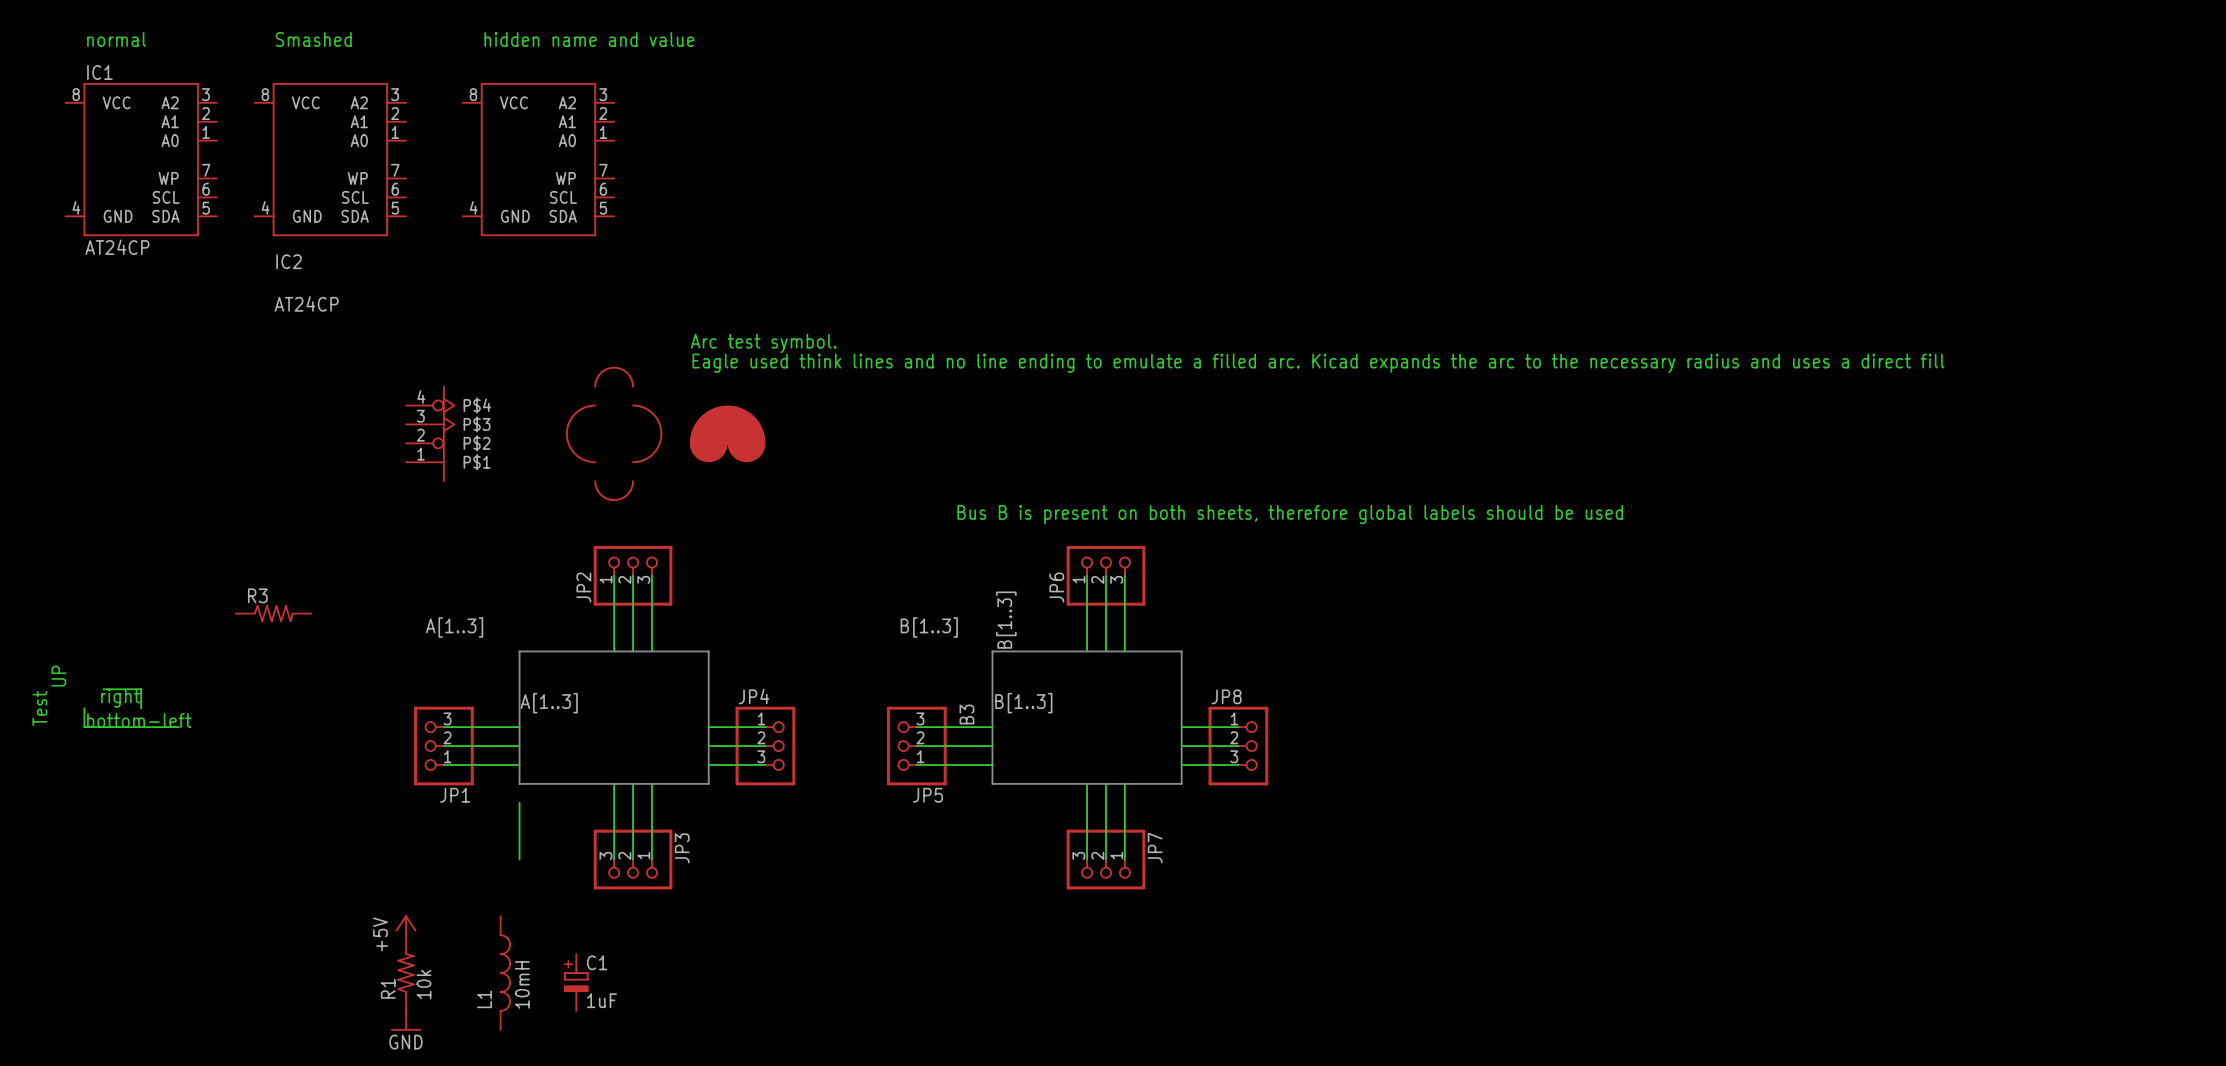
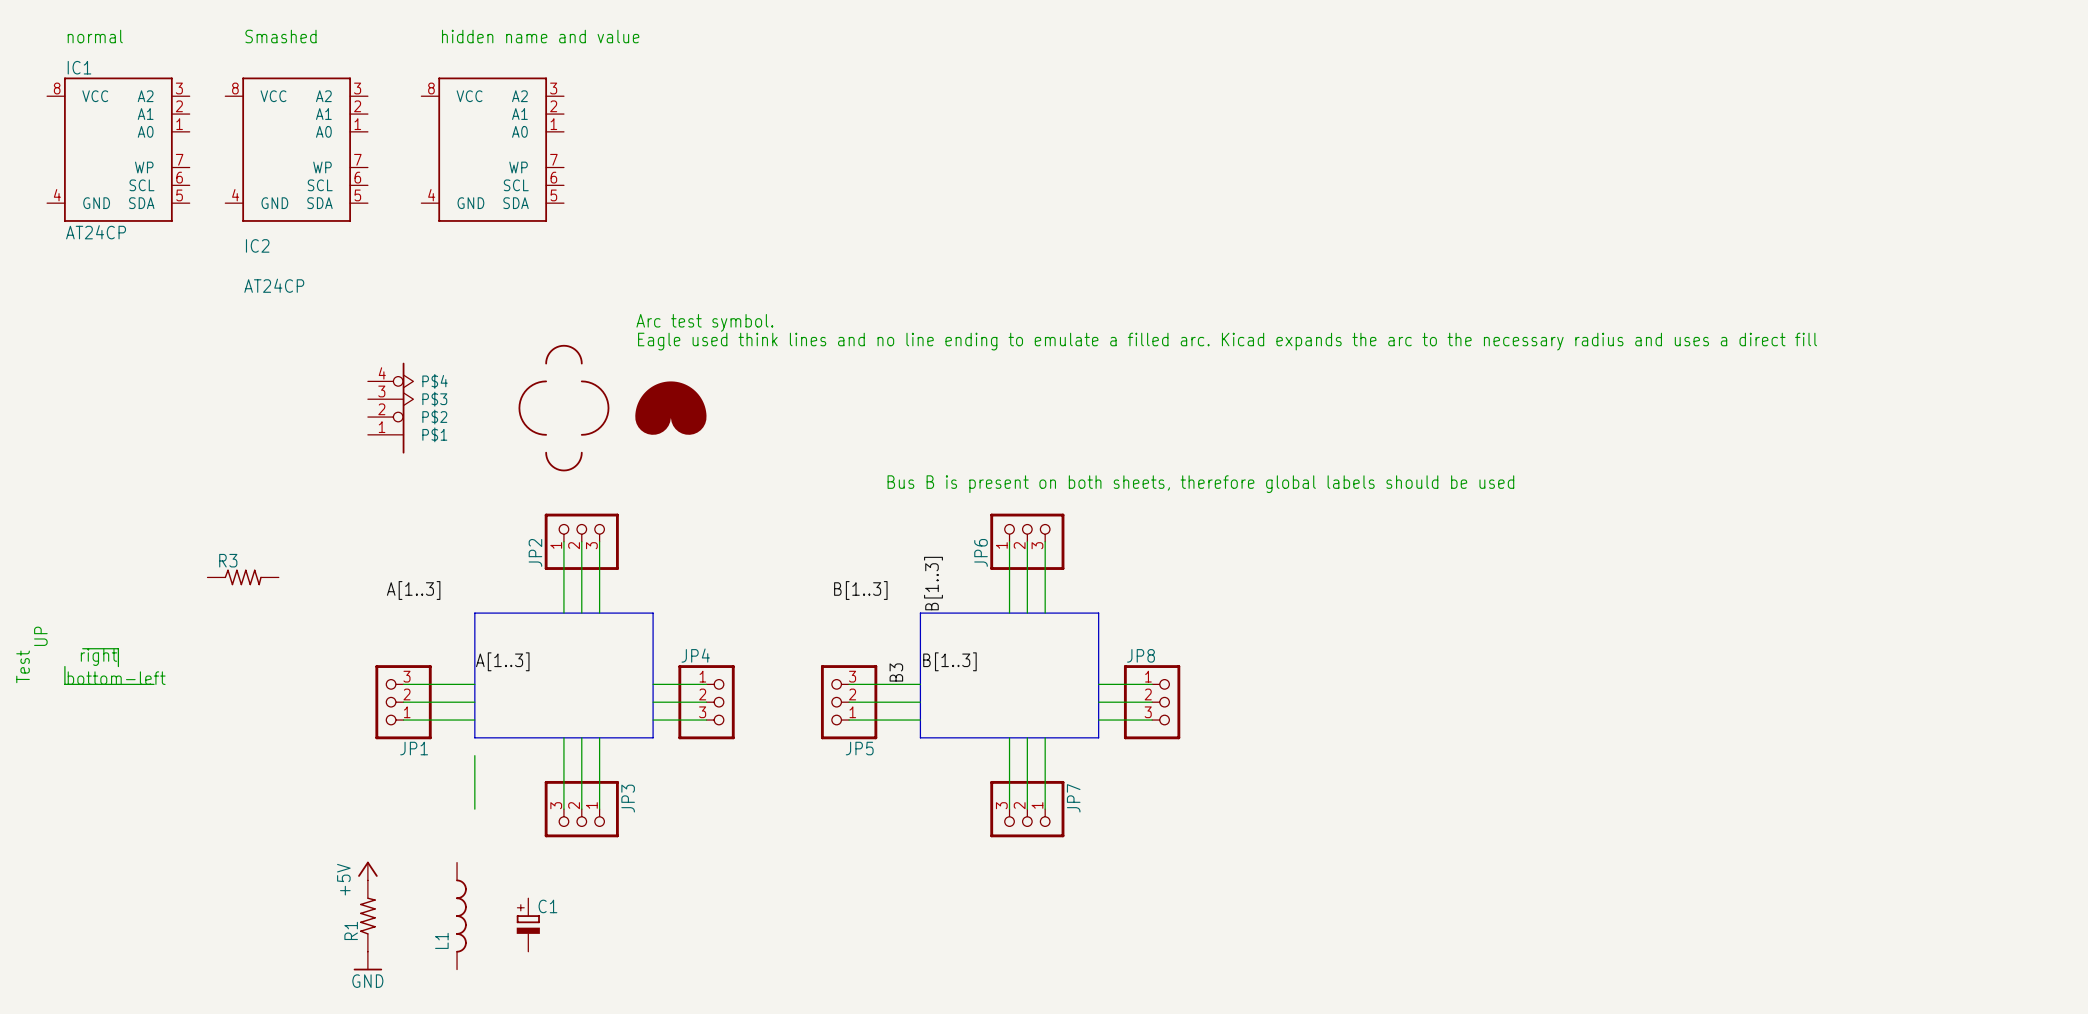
R1 value: 10k (424, 984) -> none
L1 value: 10mH (522, 984) -> none
C1 value: 1uF (601, 1000) -> none

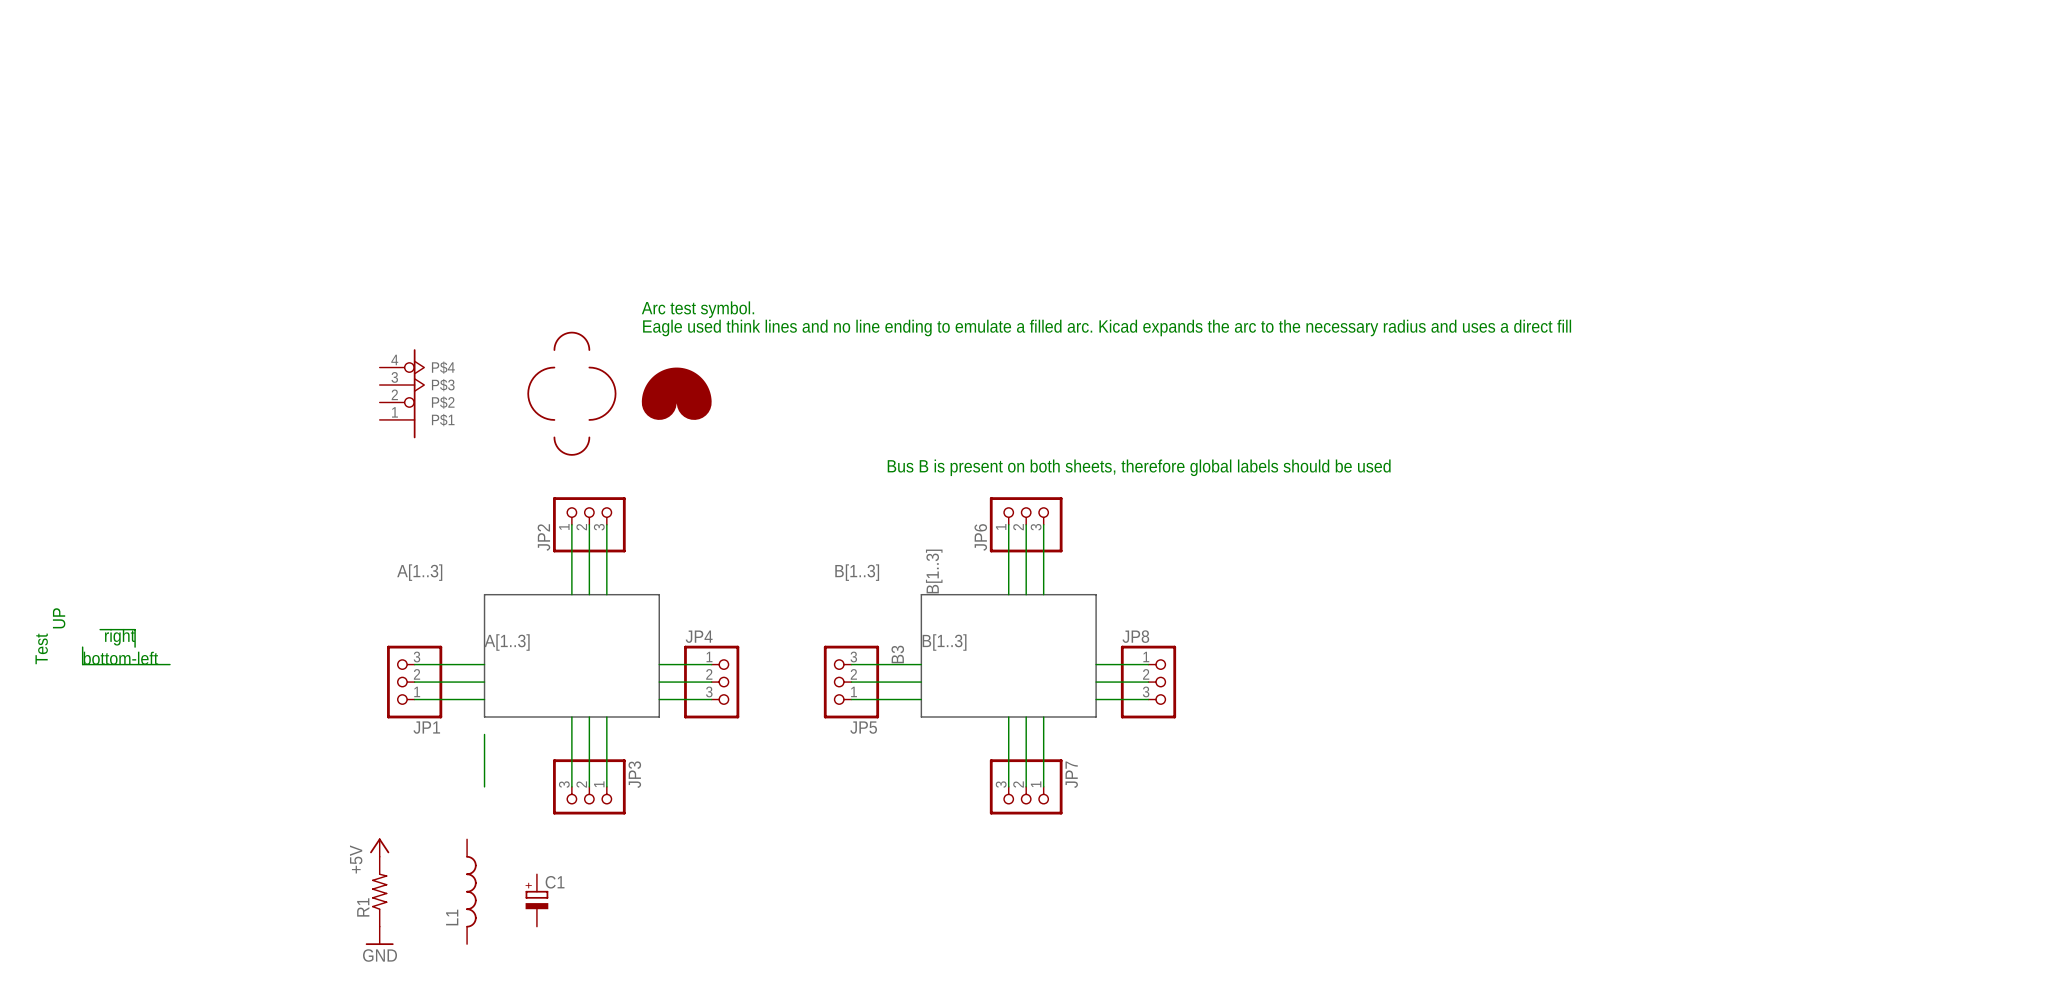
text: normal (95, 36) -> none
text: Smashed (280, 36) -> none
text: hidden name and value (540, 36) -> none
IC1: AT24CP (118, 149) -> none
IC2: AT24CP (296, 149) -> none
part: (492, 149) -> none
R3: (243, 577) -> none

